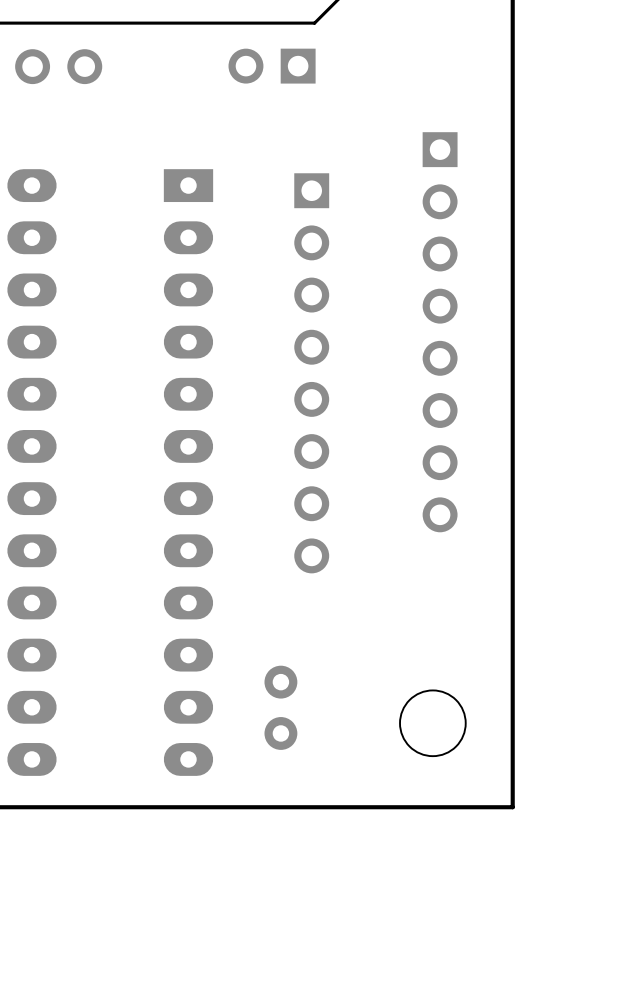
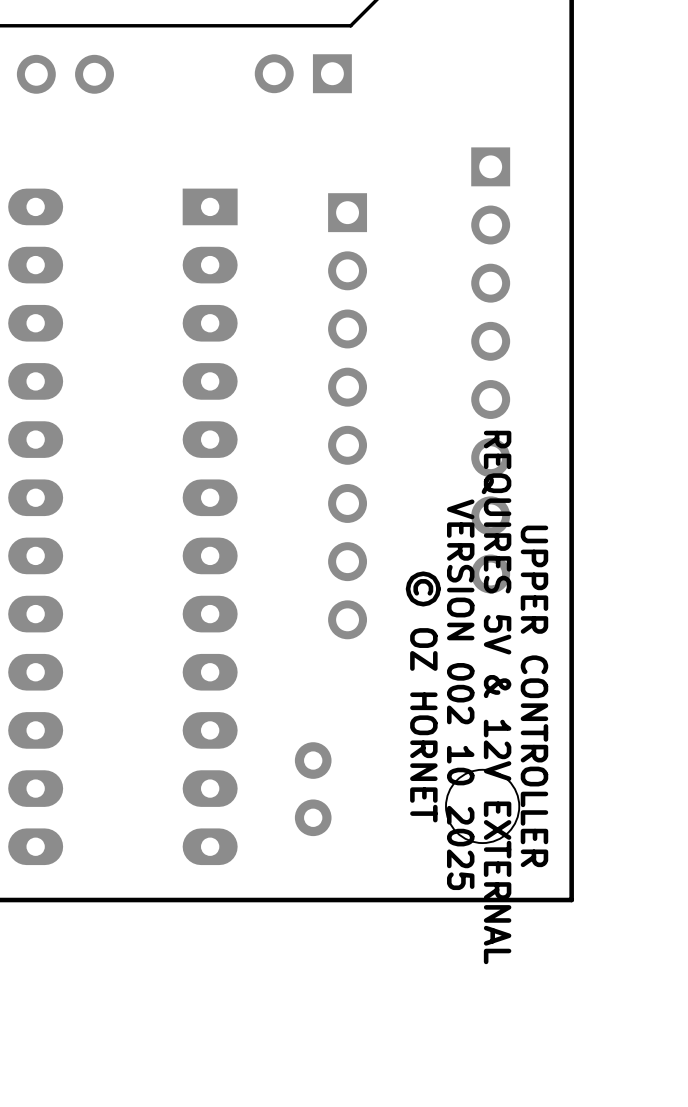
text: none -> VERSION 002 10 2025 (460, 694)
text: none -> UPPER CONTROLLER (534, 696)
text: none -> © OZ HORNET (423, 696)
text: none -> REQUIRES 5V & 12V EXTERNAL (496, 697)

